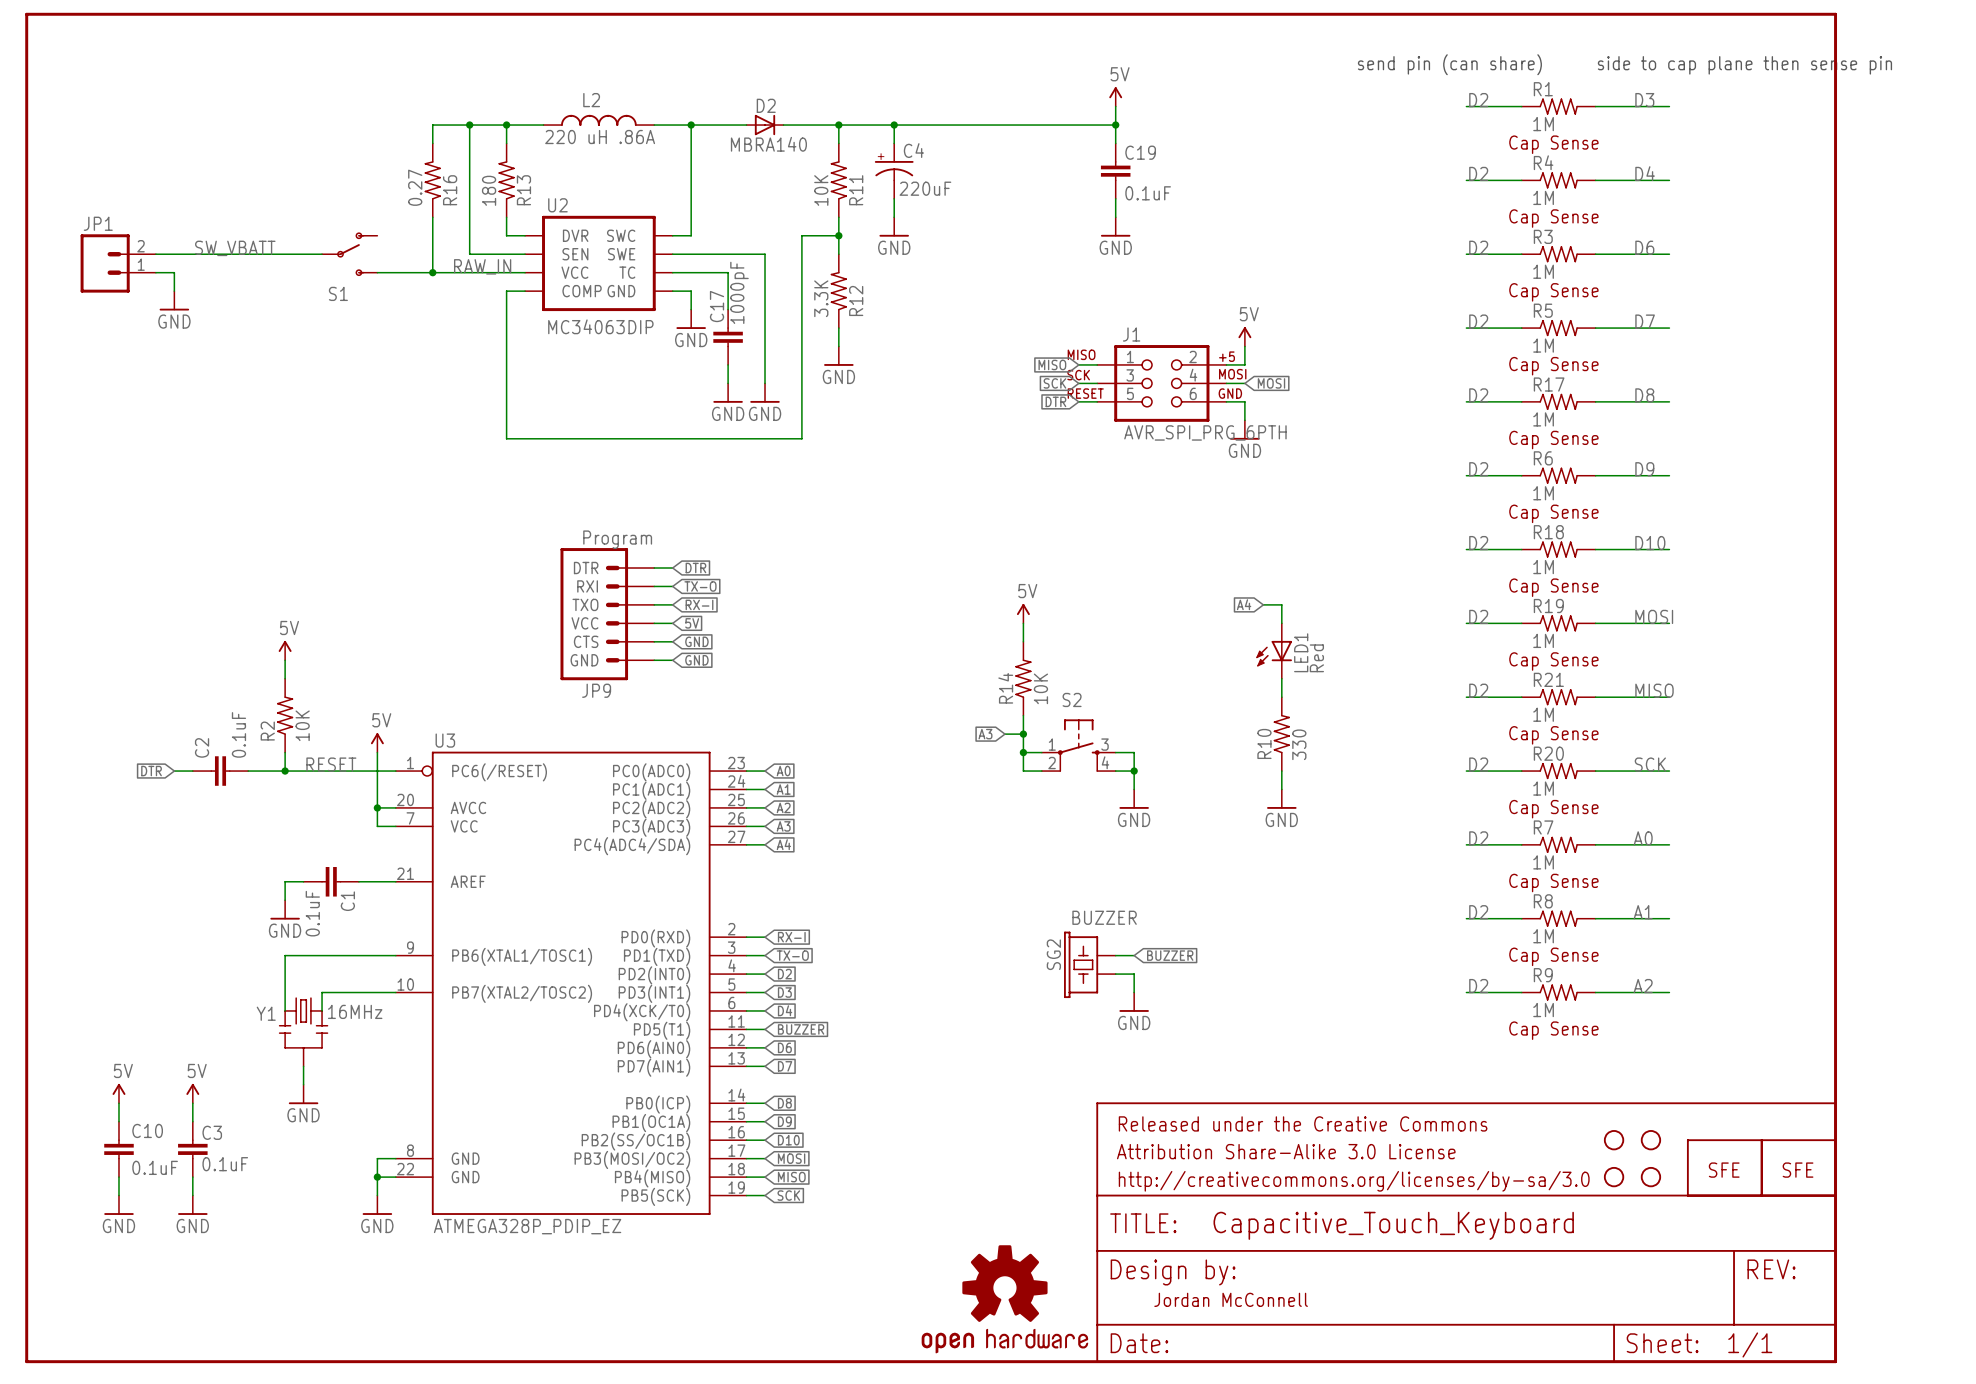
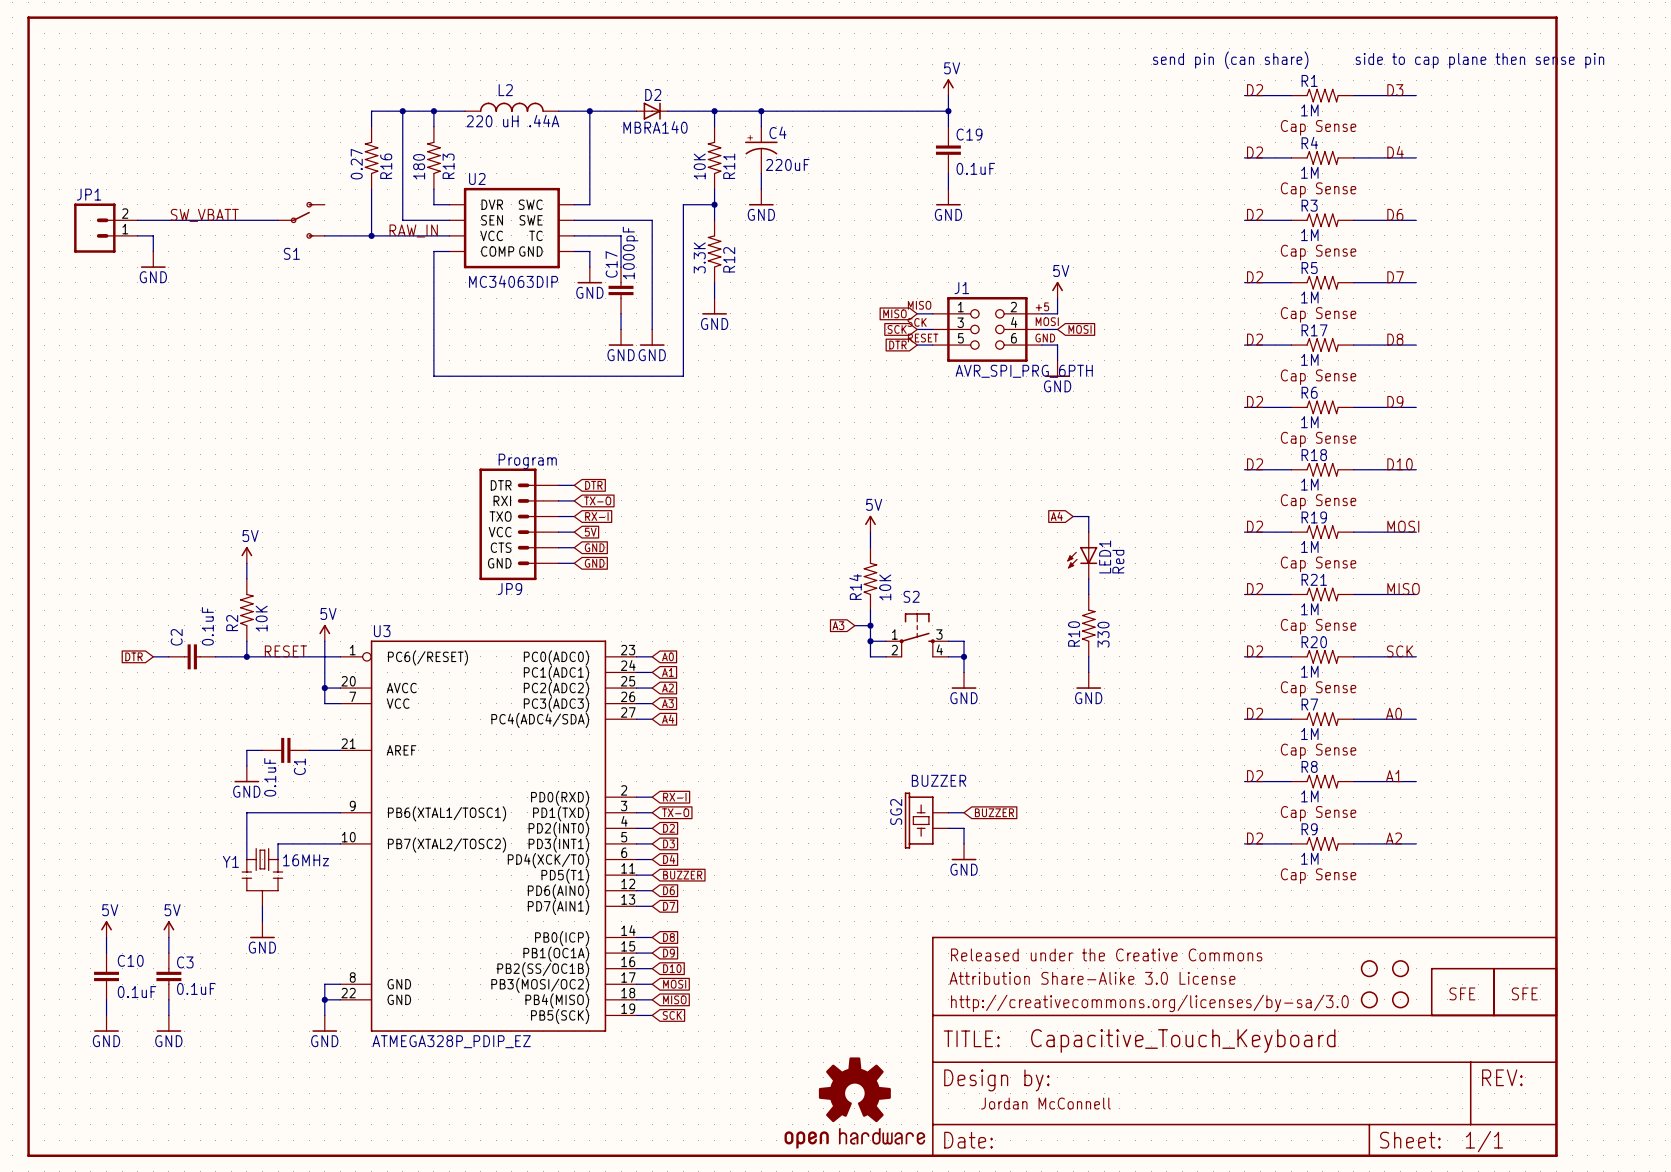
L2 value: 220 uH .86A (600, 137) -> 220 uH .44A (512, 121)

